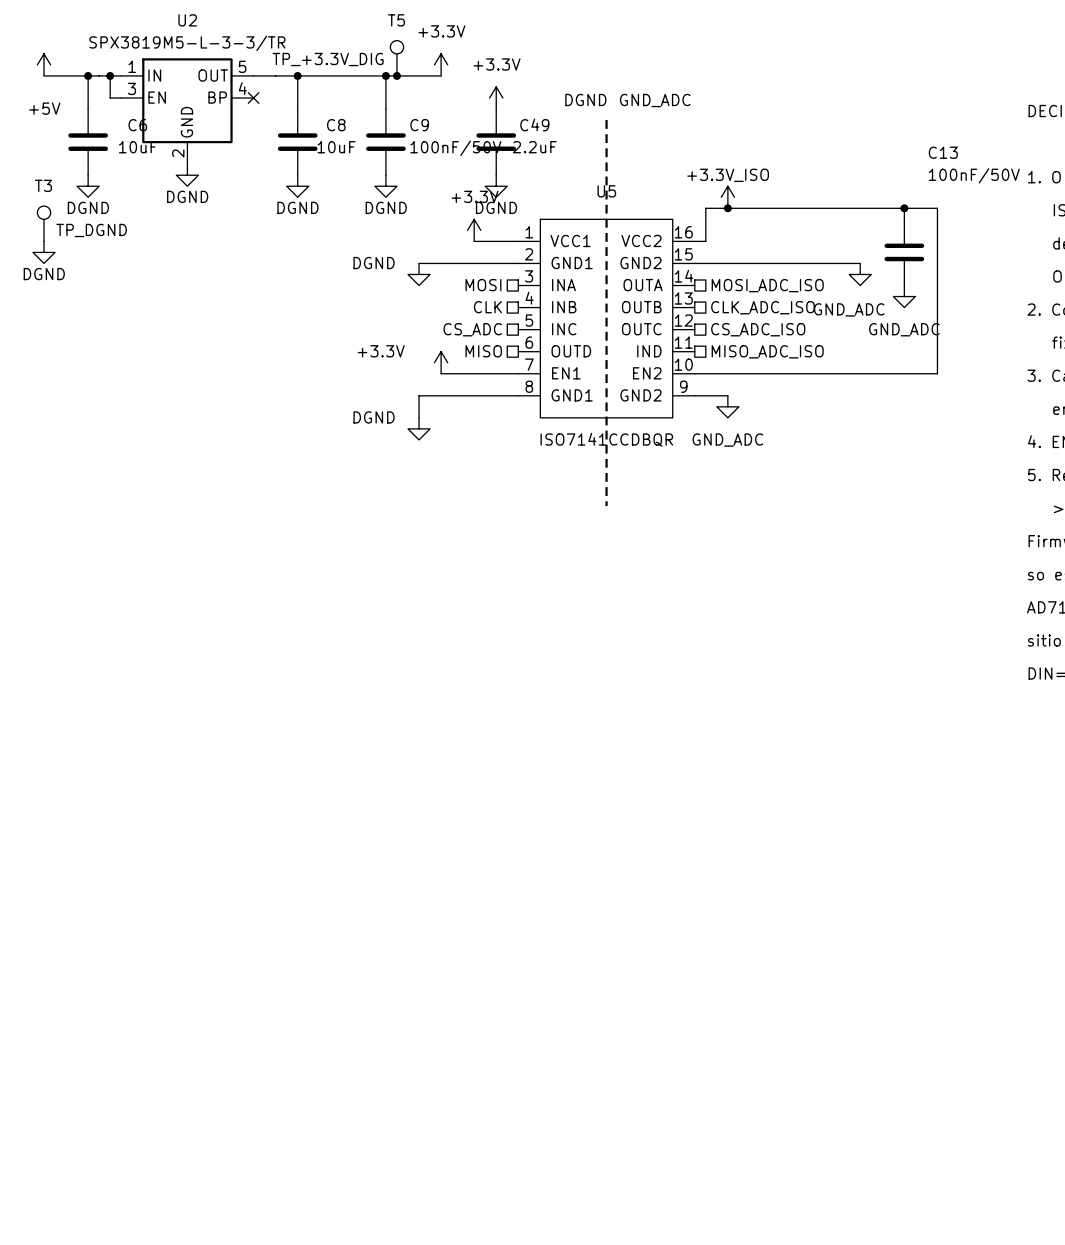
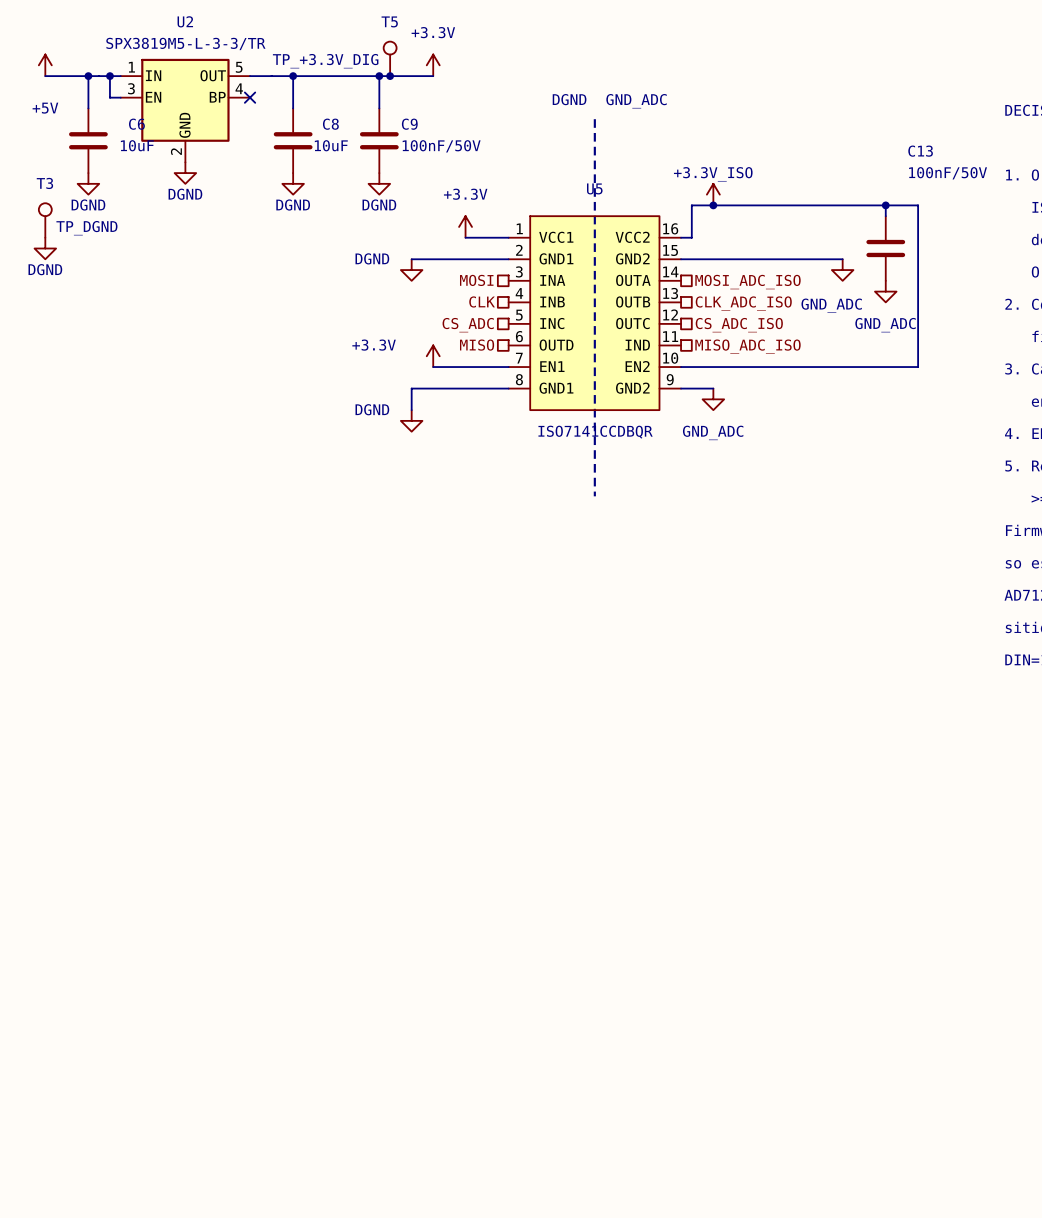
power symbol: +3.3V (496, 98) -> none
C49: 2.2uF (496, 142) -> none
power symbol: DGND (496, 186) -> none

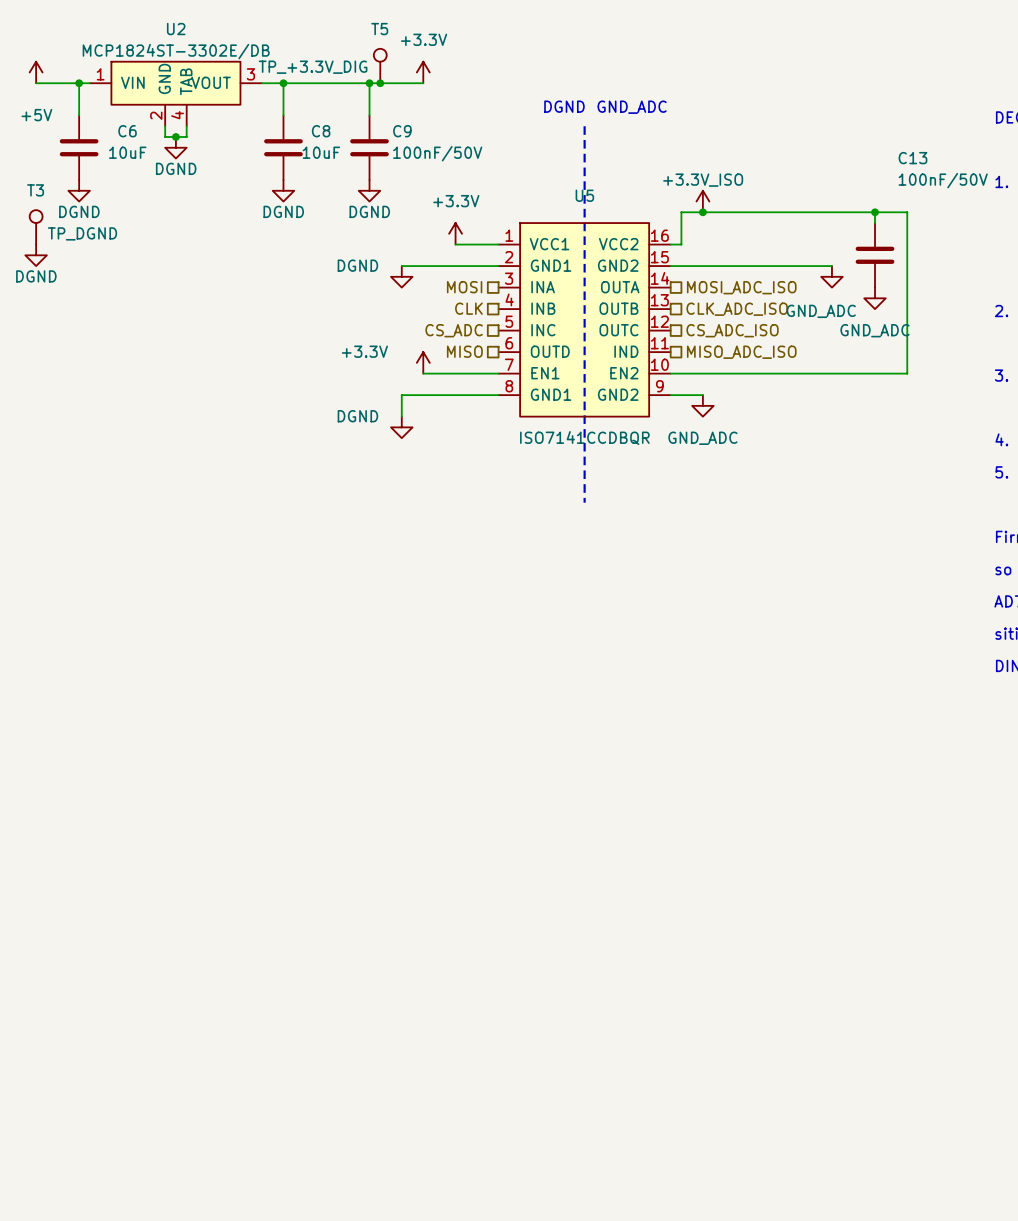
U2 value: SPX3819M5-L-3-3/TR (185, 43) -> MCP1824ST-3302E/DB (176, 51)
U2 symbol: [120, 58, 251, 163] -> [89, 61, 262, 127]
wire: (109, 76) (109, 97) (120, 97) -> none
junction: (109, 76) -> none
no-connect mark: (250, 97) -> none
junction: none -> (175, 137)
power symbol position: DGND (185, 173) -> DGND (175, 147)

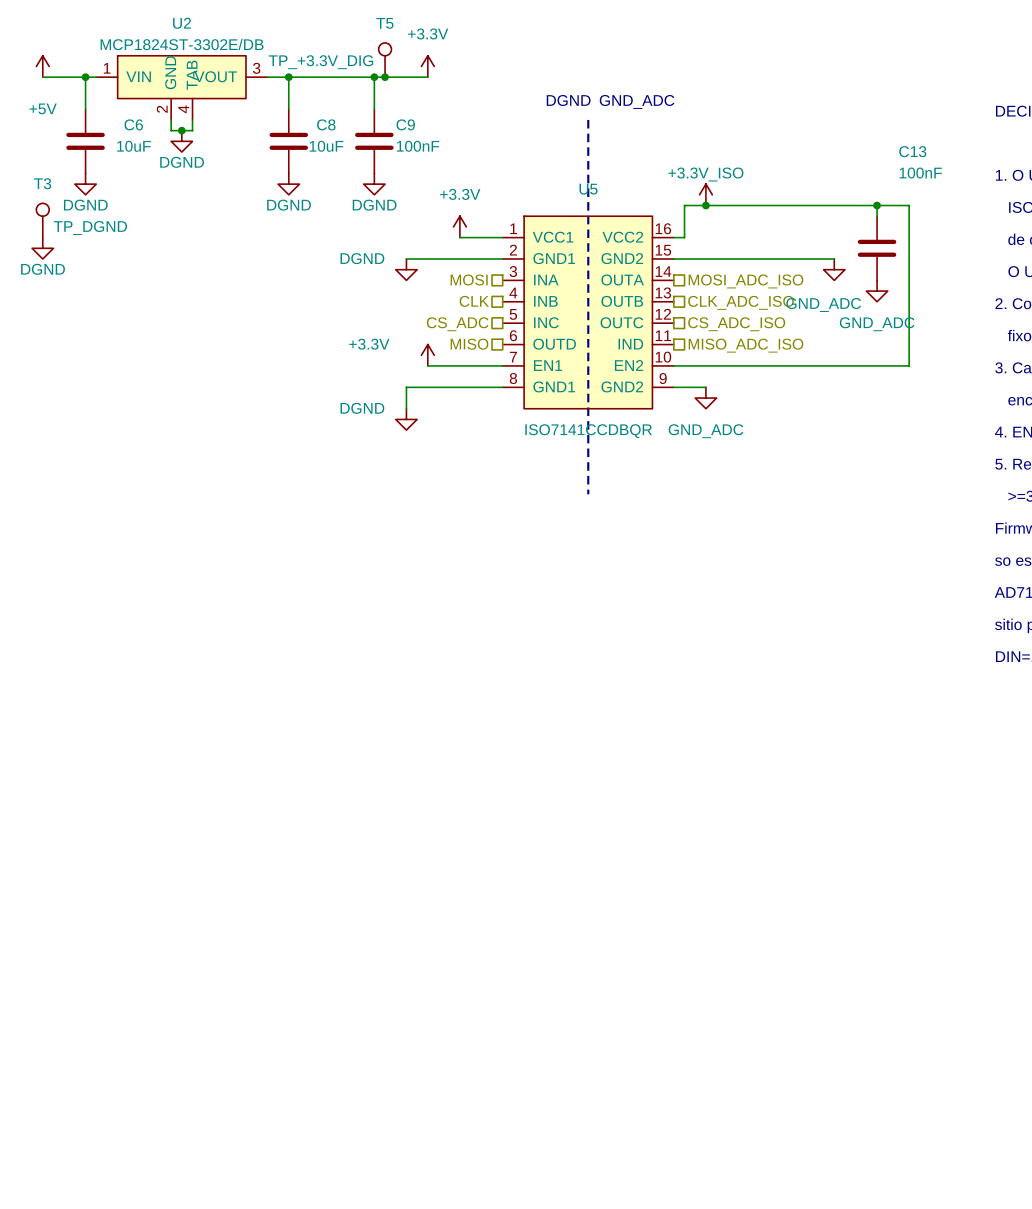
C9 value: 100nF/50V (437, 153) -> 100nF (418, 146)
C13 value: 100nF/50V (943, 180) -> 100nF (920, 173)

